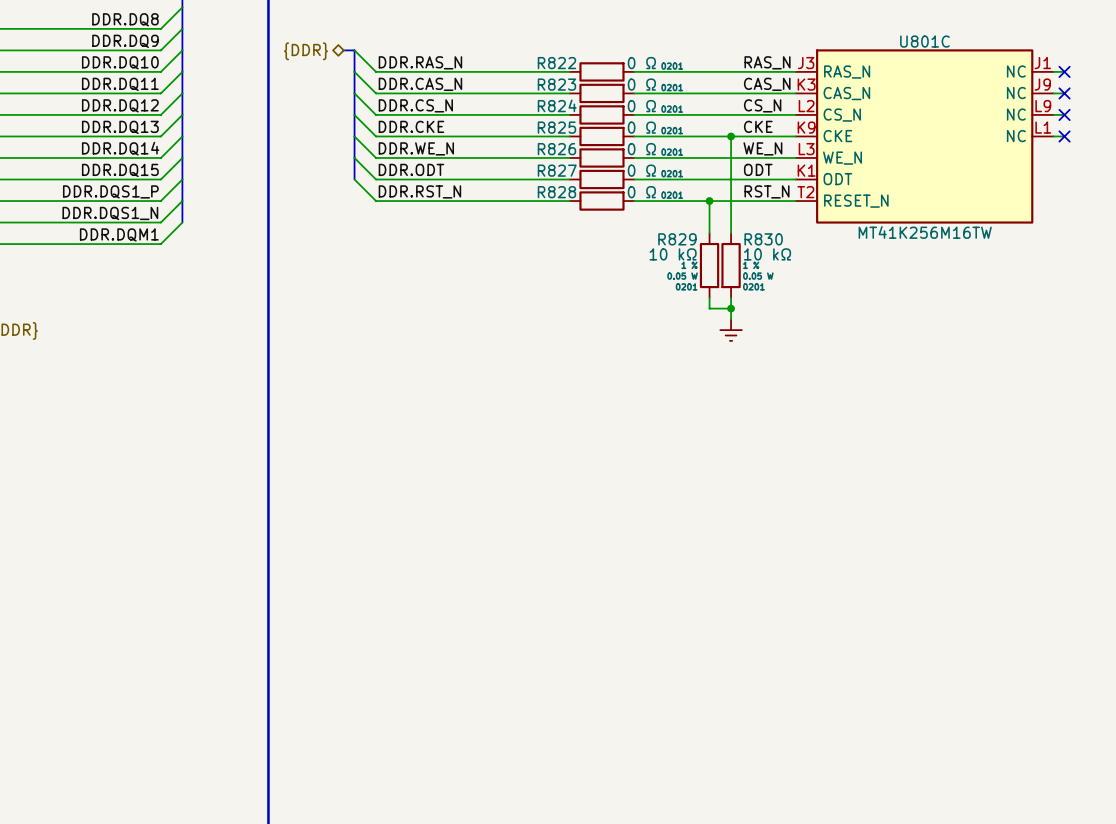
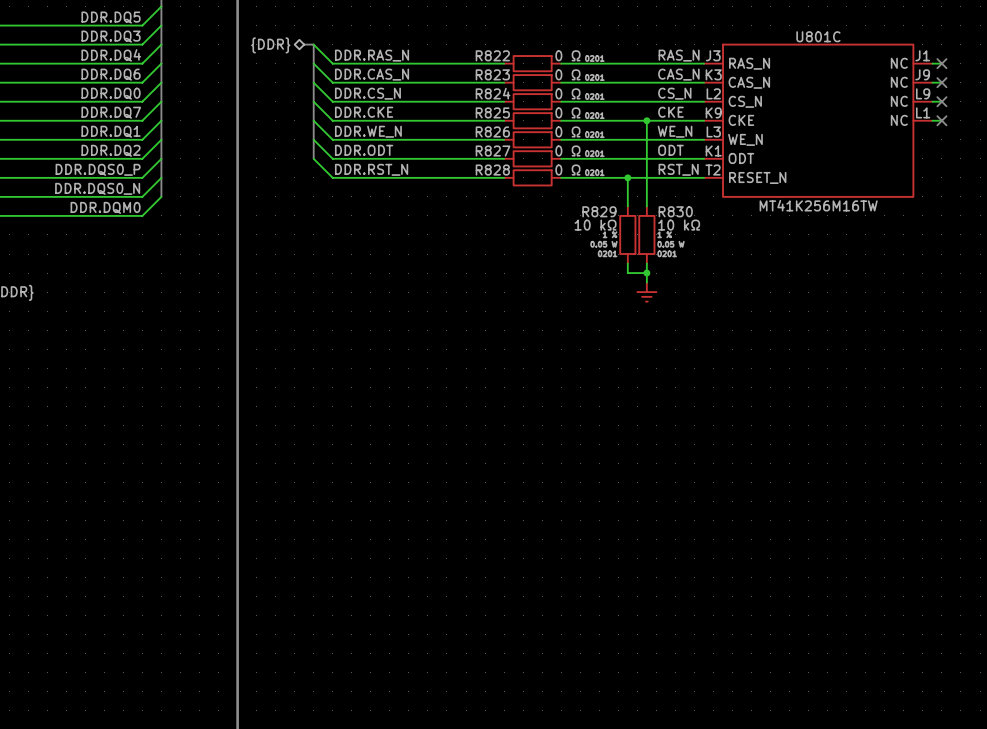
label: DDR.DQ8 (125, 19) -> DDR.DQ5 (111, 17)
label: DDR.DQ9 (125, 41) -> DDR.DQ3 (111, 36)
label: DDR.DQ10 (120, 62) -> DDR.DQ4 (111, 55)
label: DDR.DQ11 (120, 84) -> DDR.DQ6 (111, 74)
label: DDR.DQ12 (120, 105) -> DDR.DQ0 (111, 93)
label: DDR.DQ13 (120, 127) -> DDR.DQ7 (111, 112)
label: DDR.DQ14 (120, 148) -> DDR.DQ1 (111, 131)
label: DDR.DQ15 (120, 170) -> DDR.DQ2 (111, 150)
label: DDR.DQS1_P (110, 191) -> DDR.DQS0_P (98, 169)
label: DDR.DQS1_N (110, 213) -> DDR.DQS0_N (97, 188)
label: DDR.DQM1 (119, 234) -> DDR.DQM0 (105, 207)

